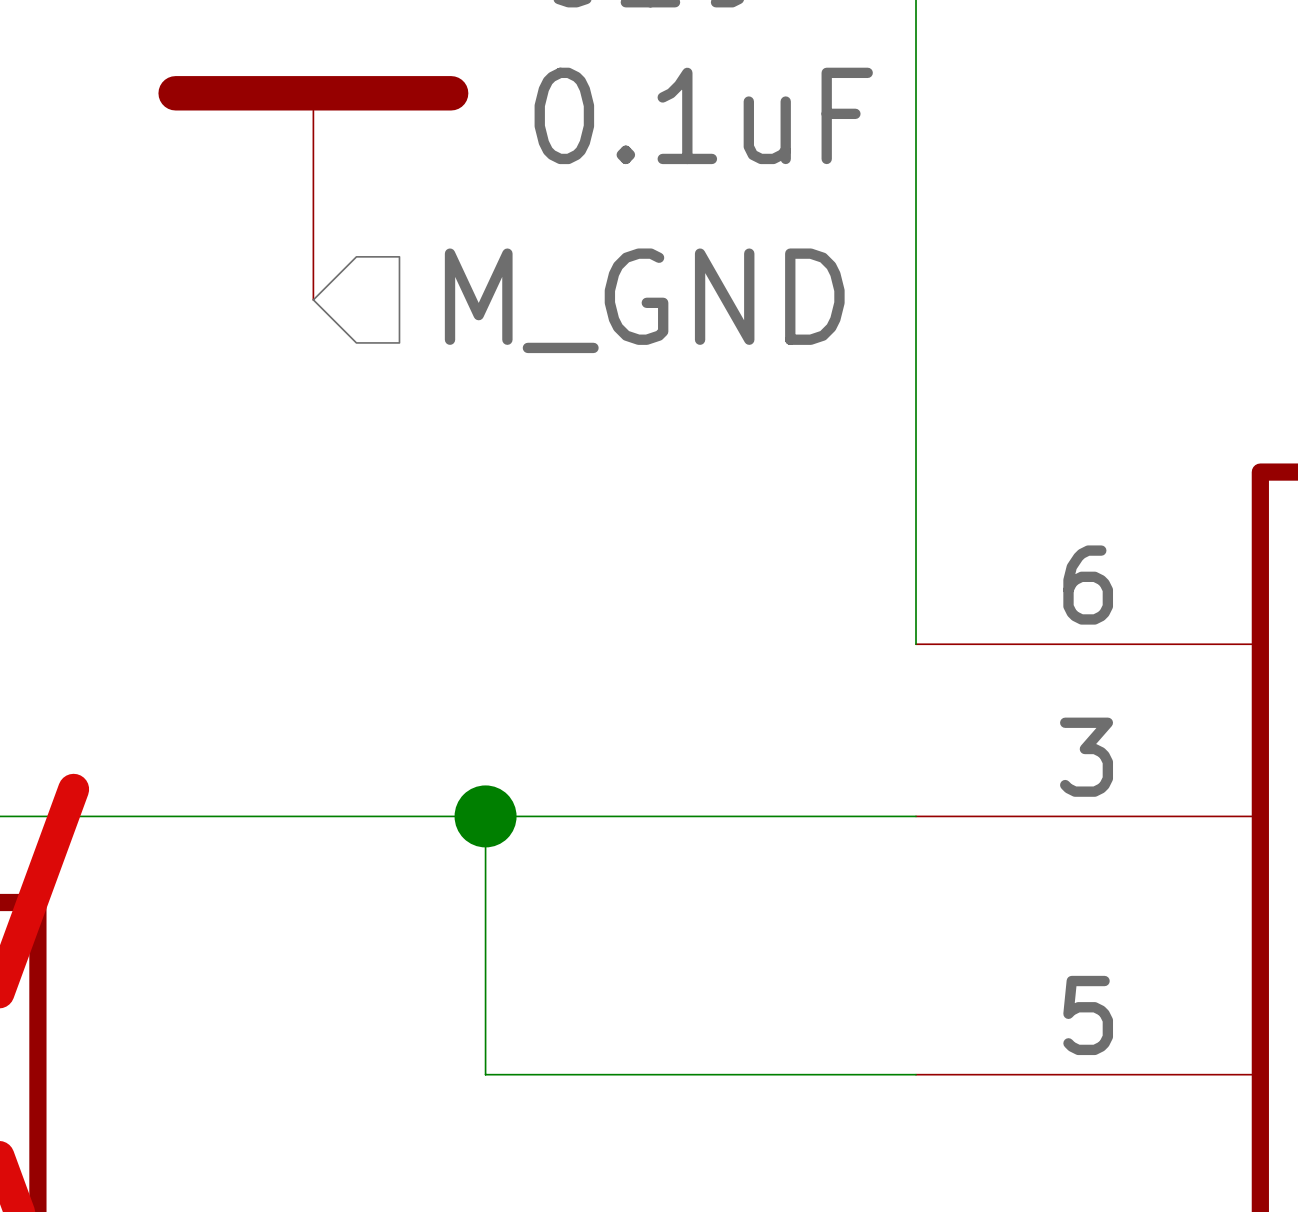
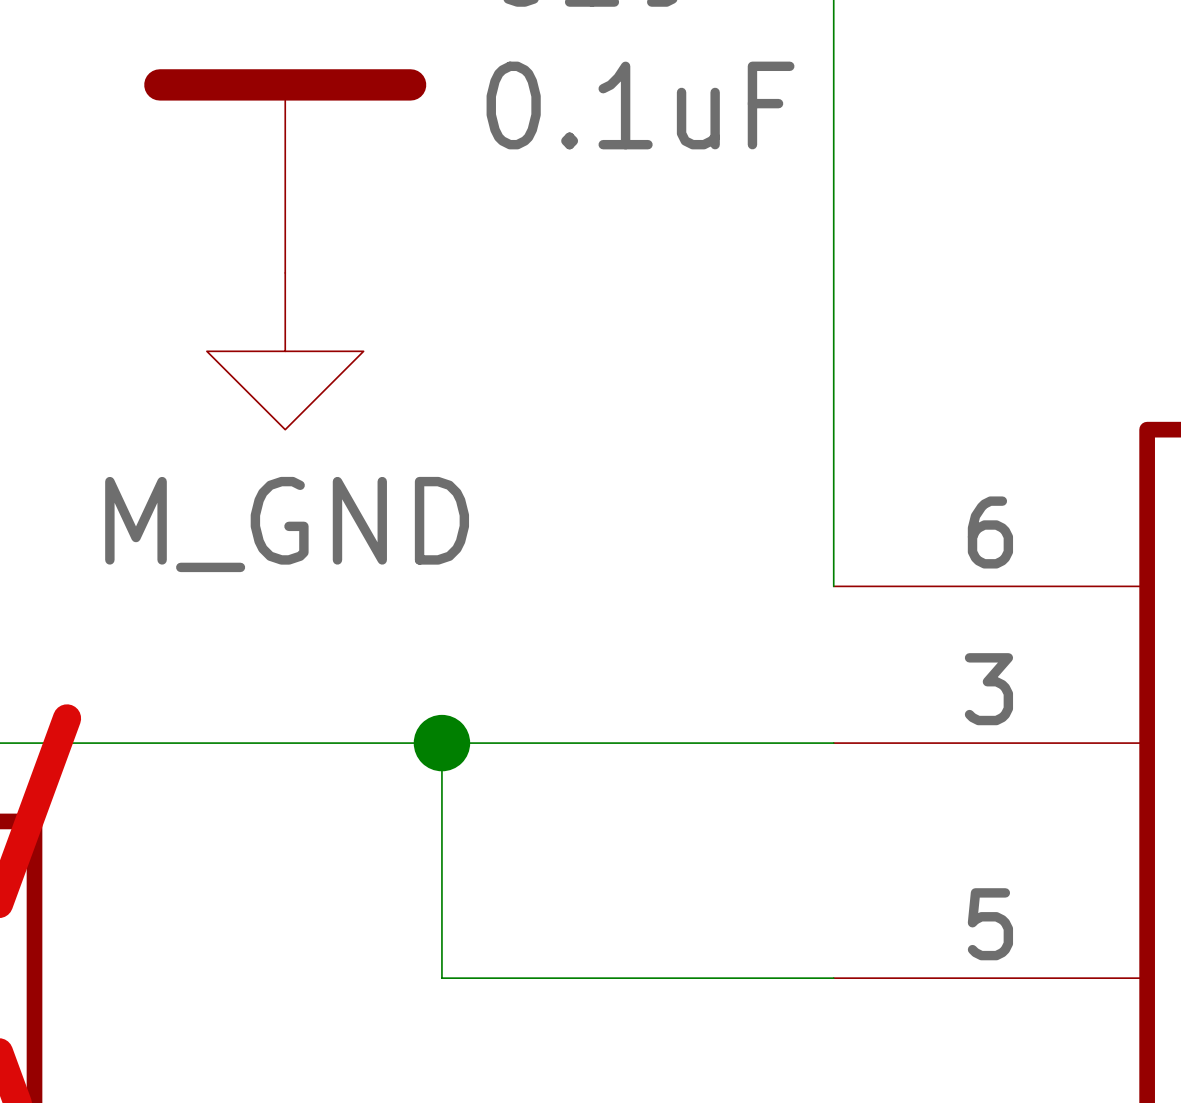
hierarchical label: M_GND (644, 300) -> none
power symbol: none -> M_GND (285, 351)

